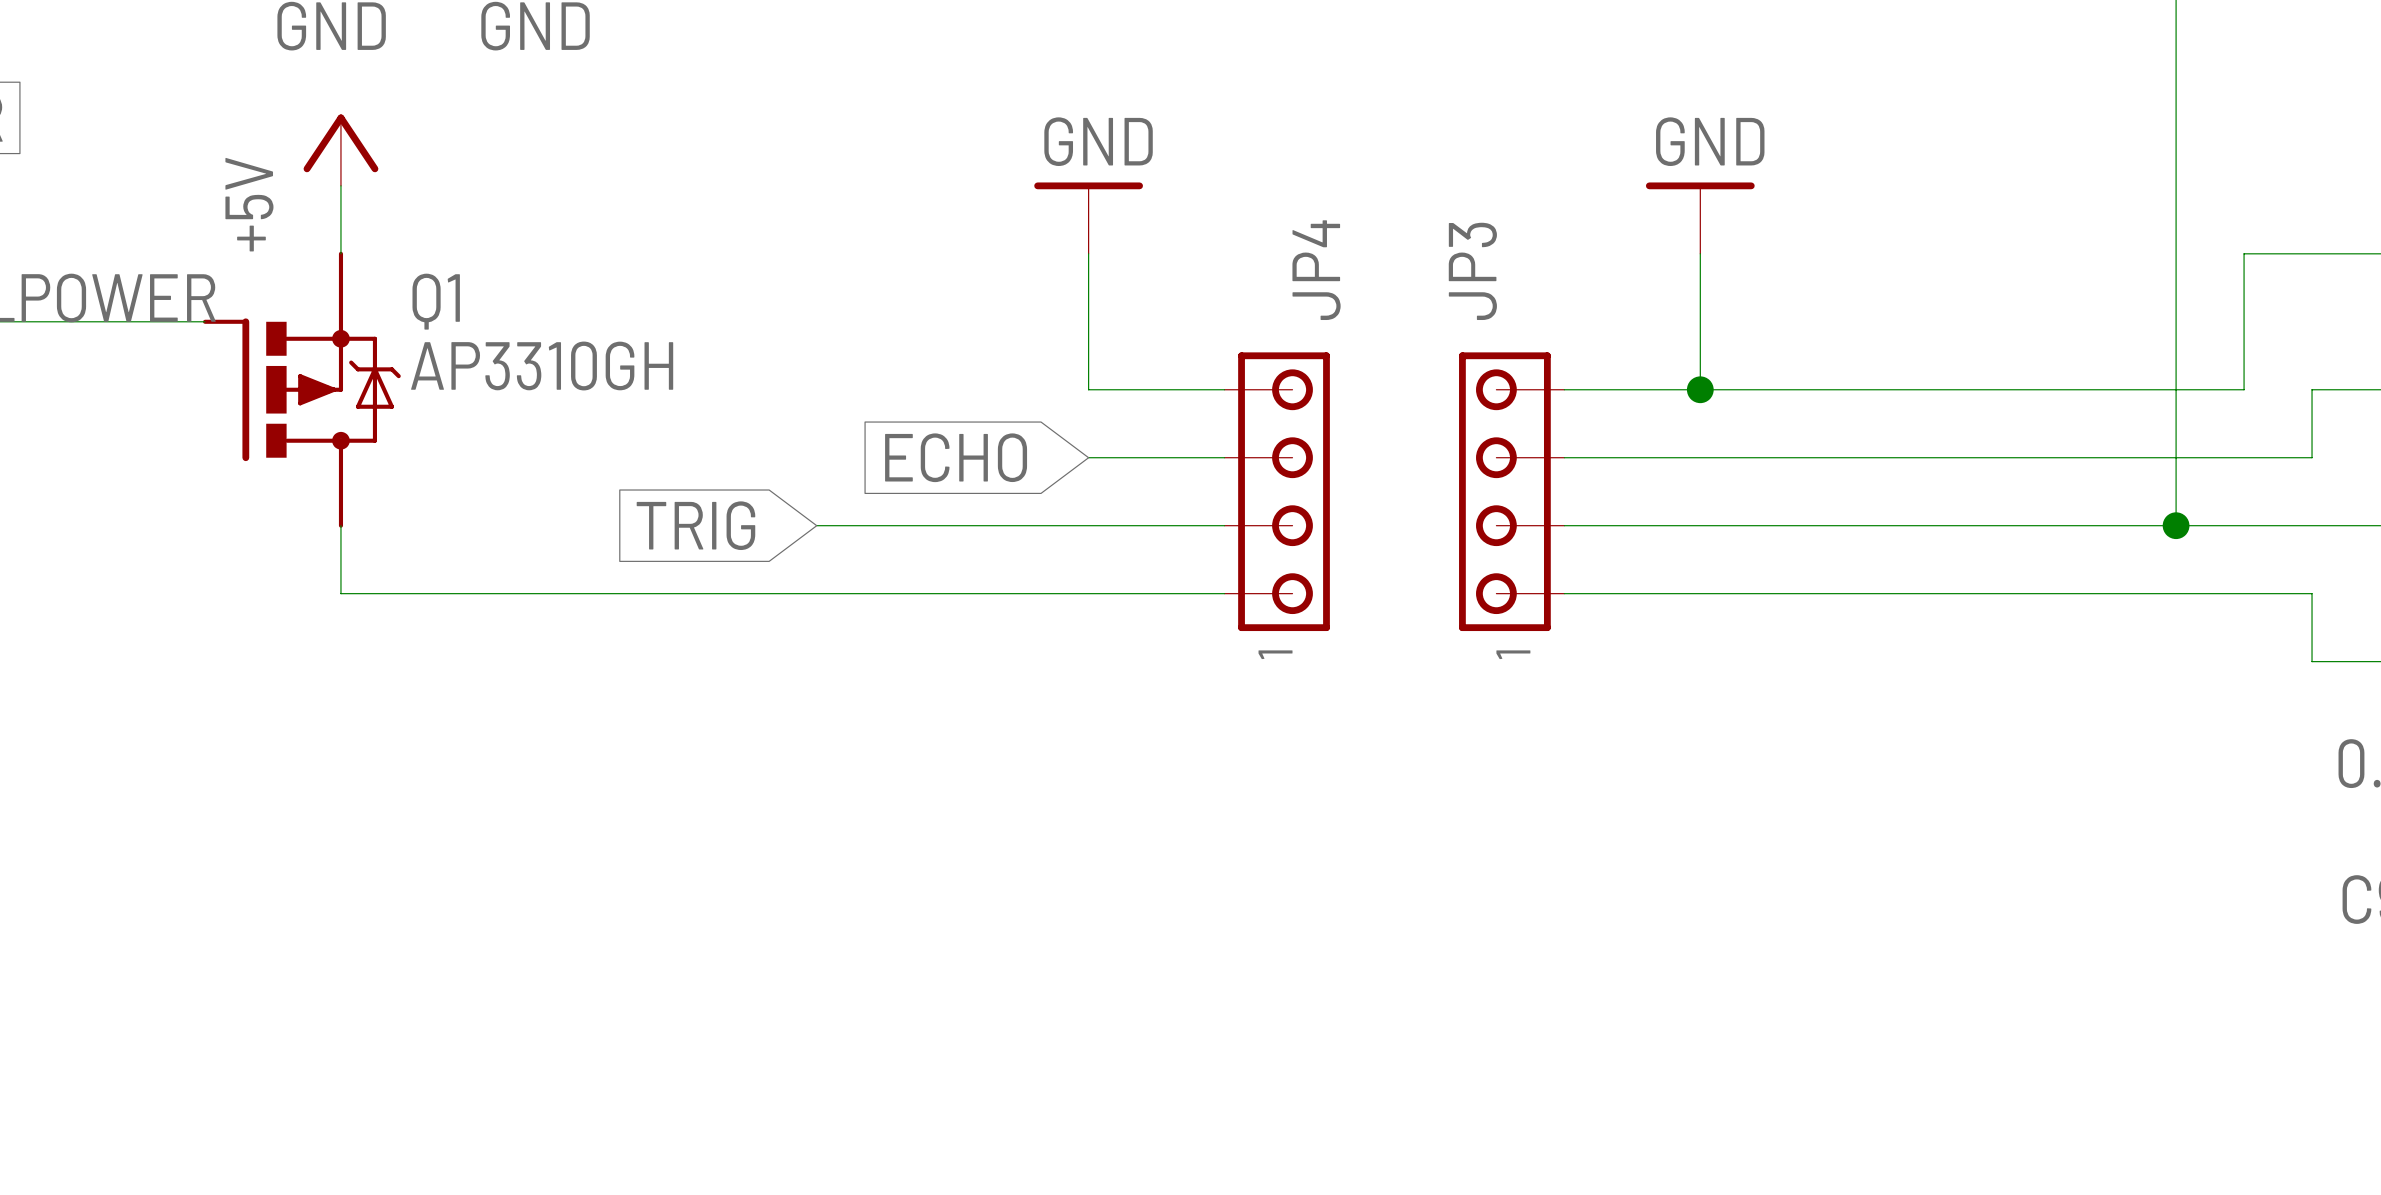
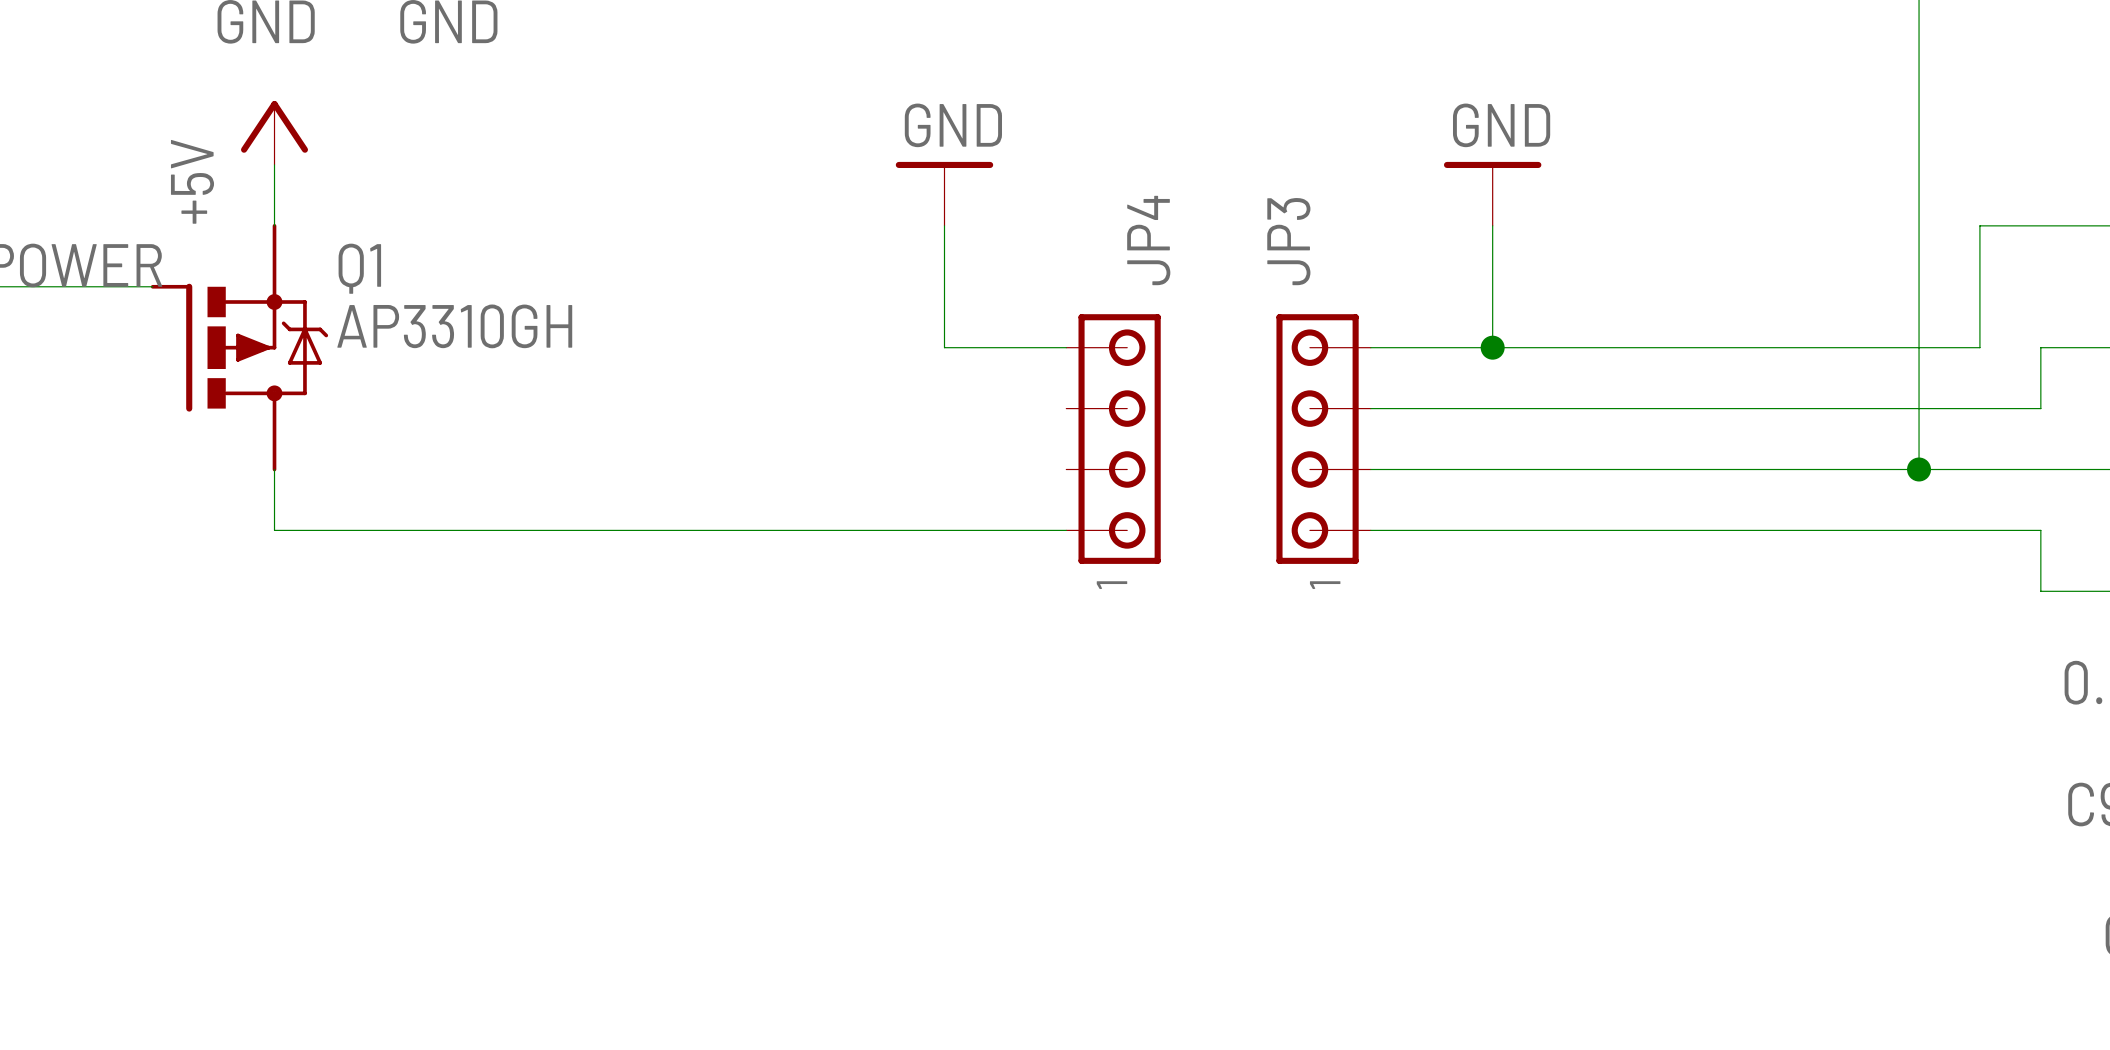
global label: ECHO (956, 457) -> none
wire: (1088, 457) (1224, 457) -> none
global label: TRIG (695, 525) -> none
wire: (816, 525) (1224, 525) -> none

